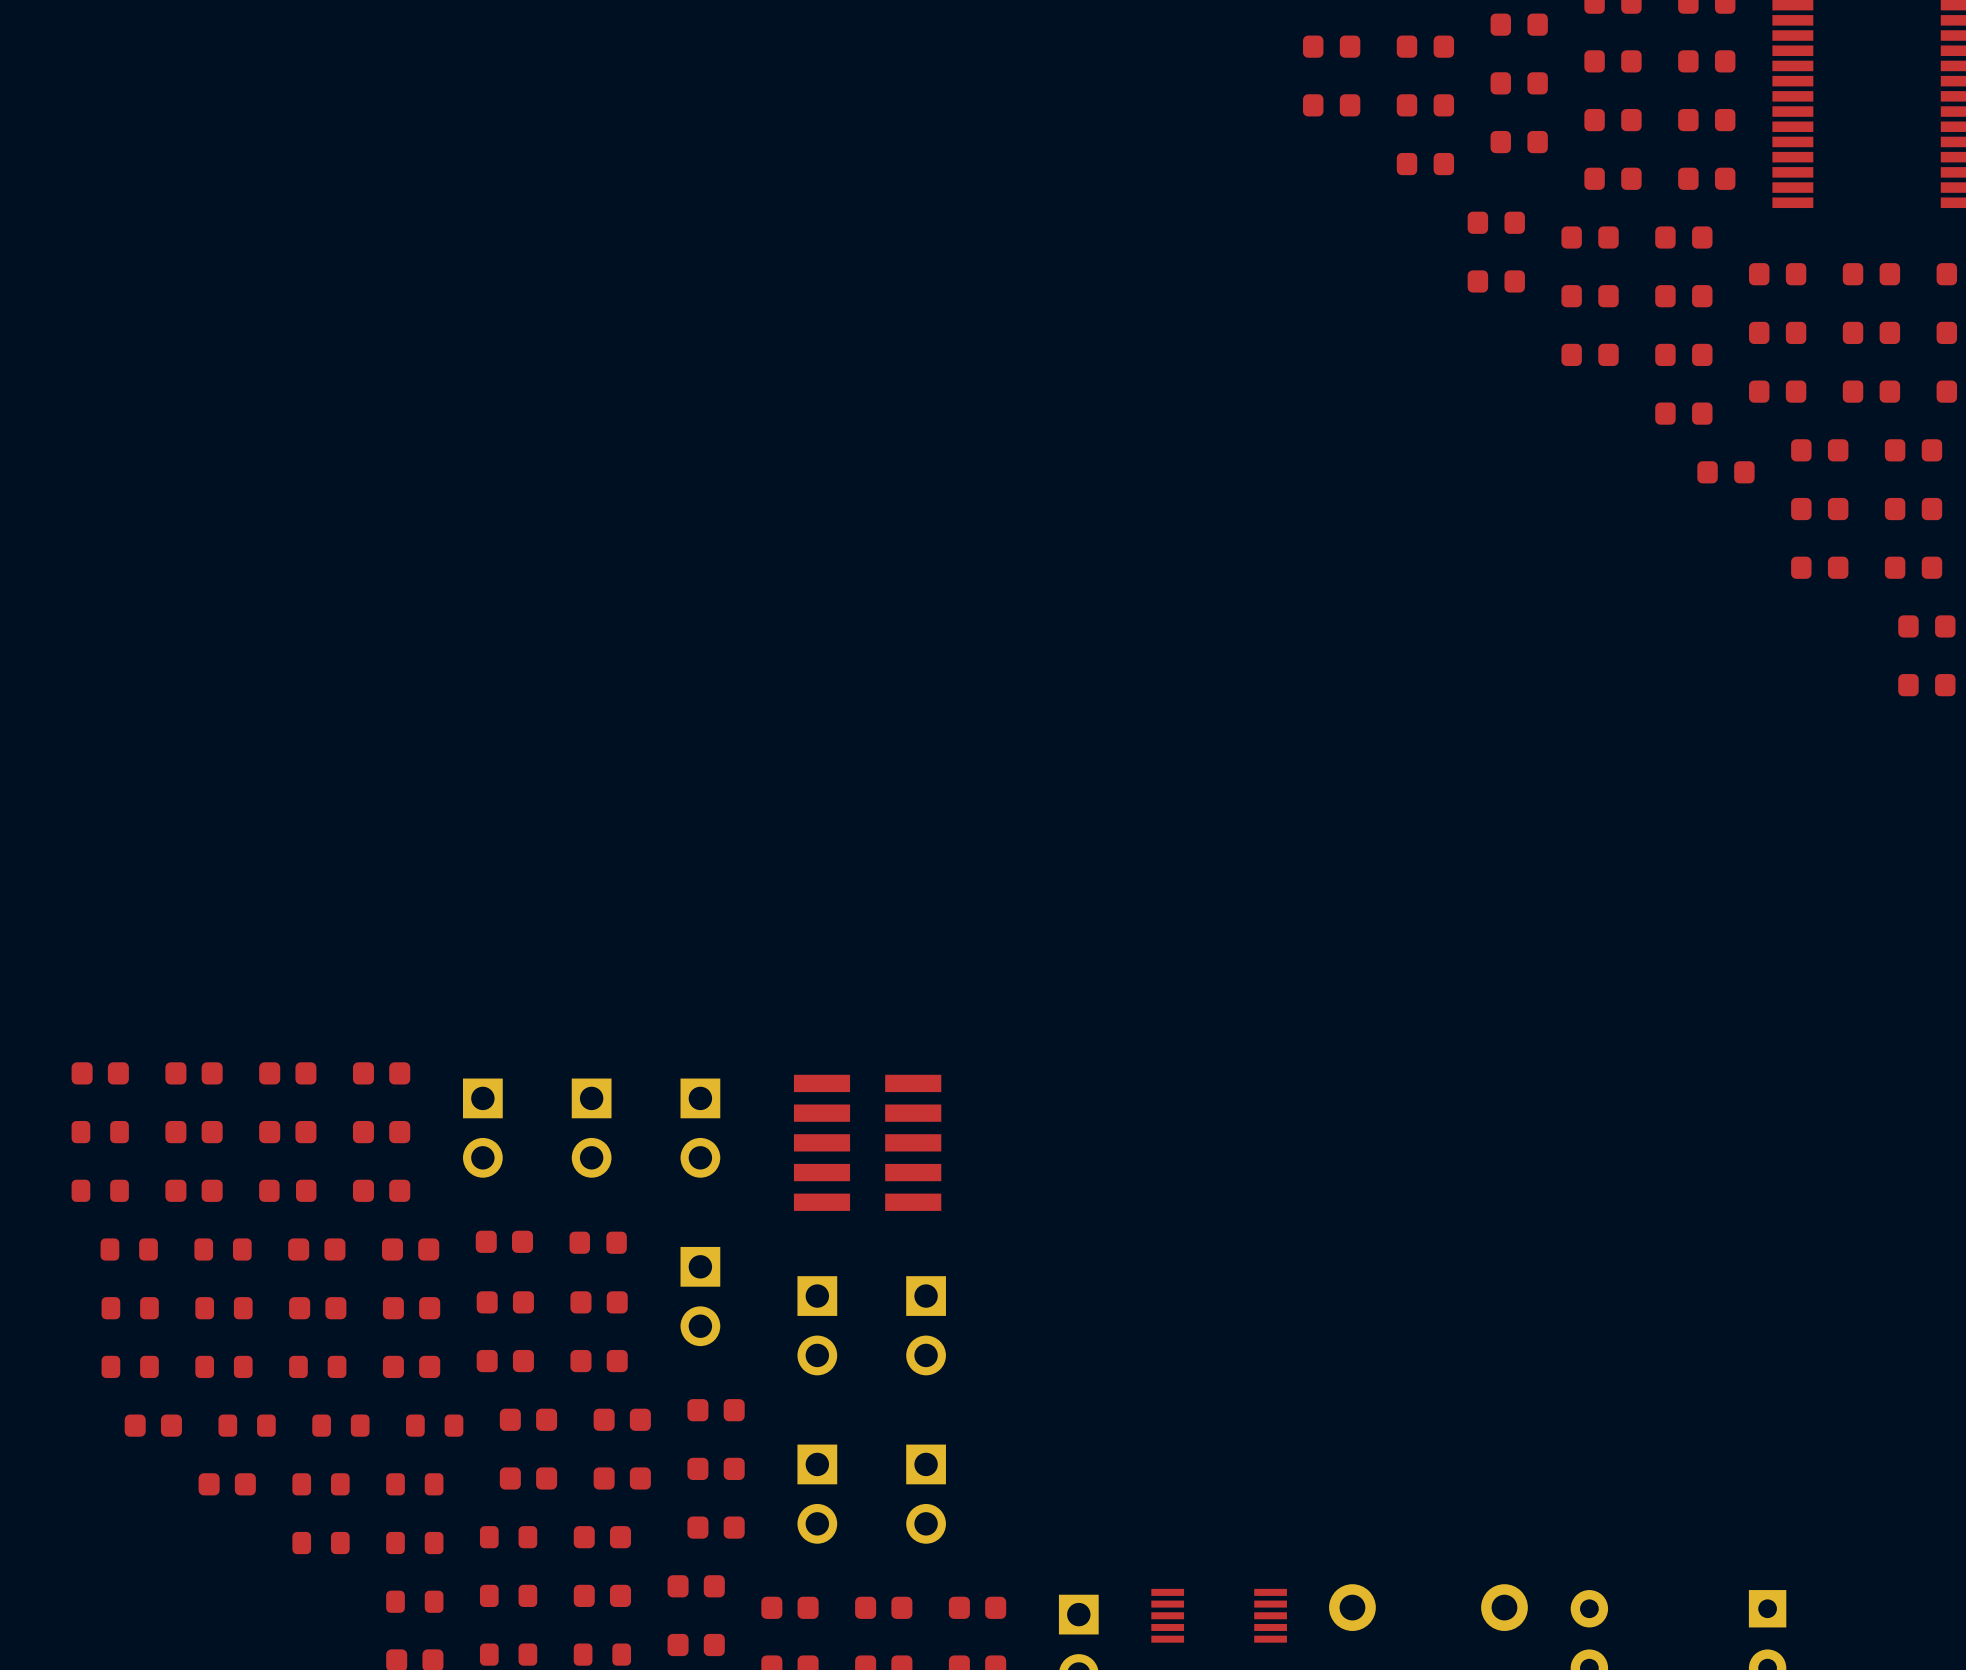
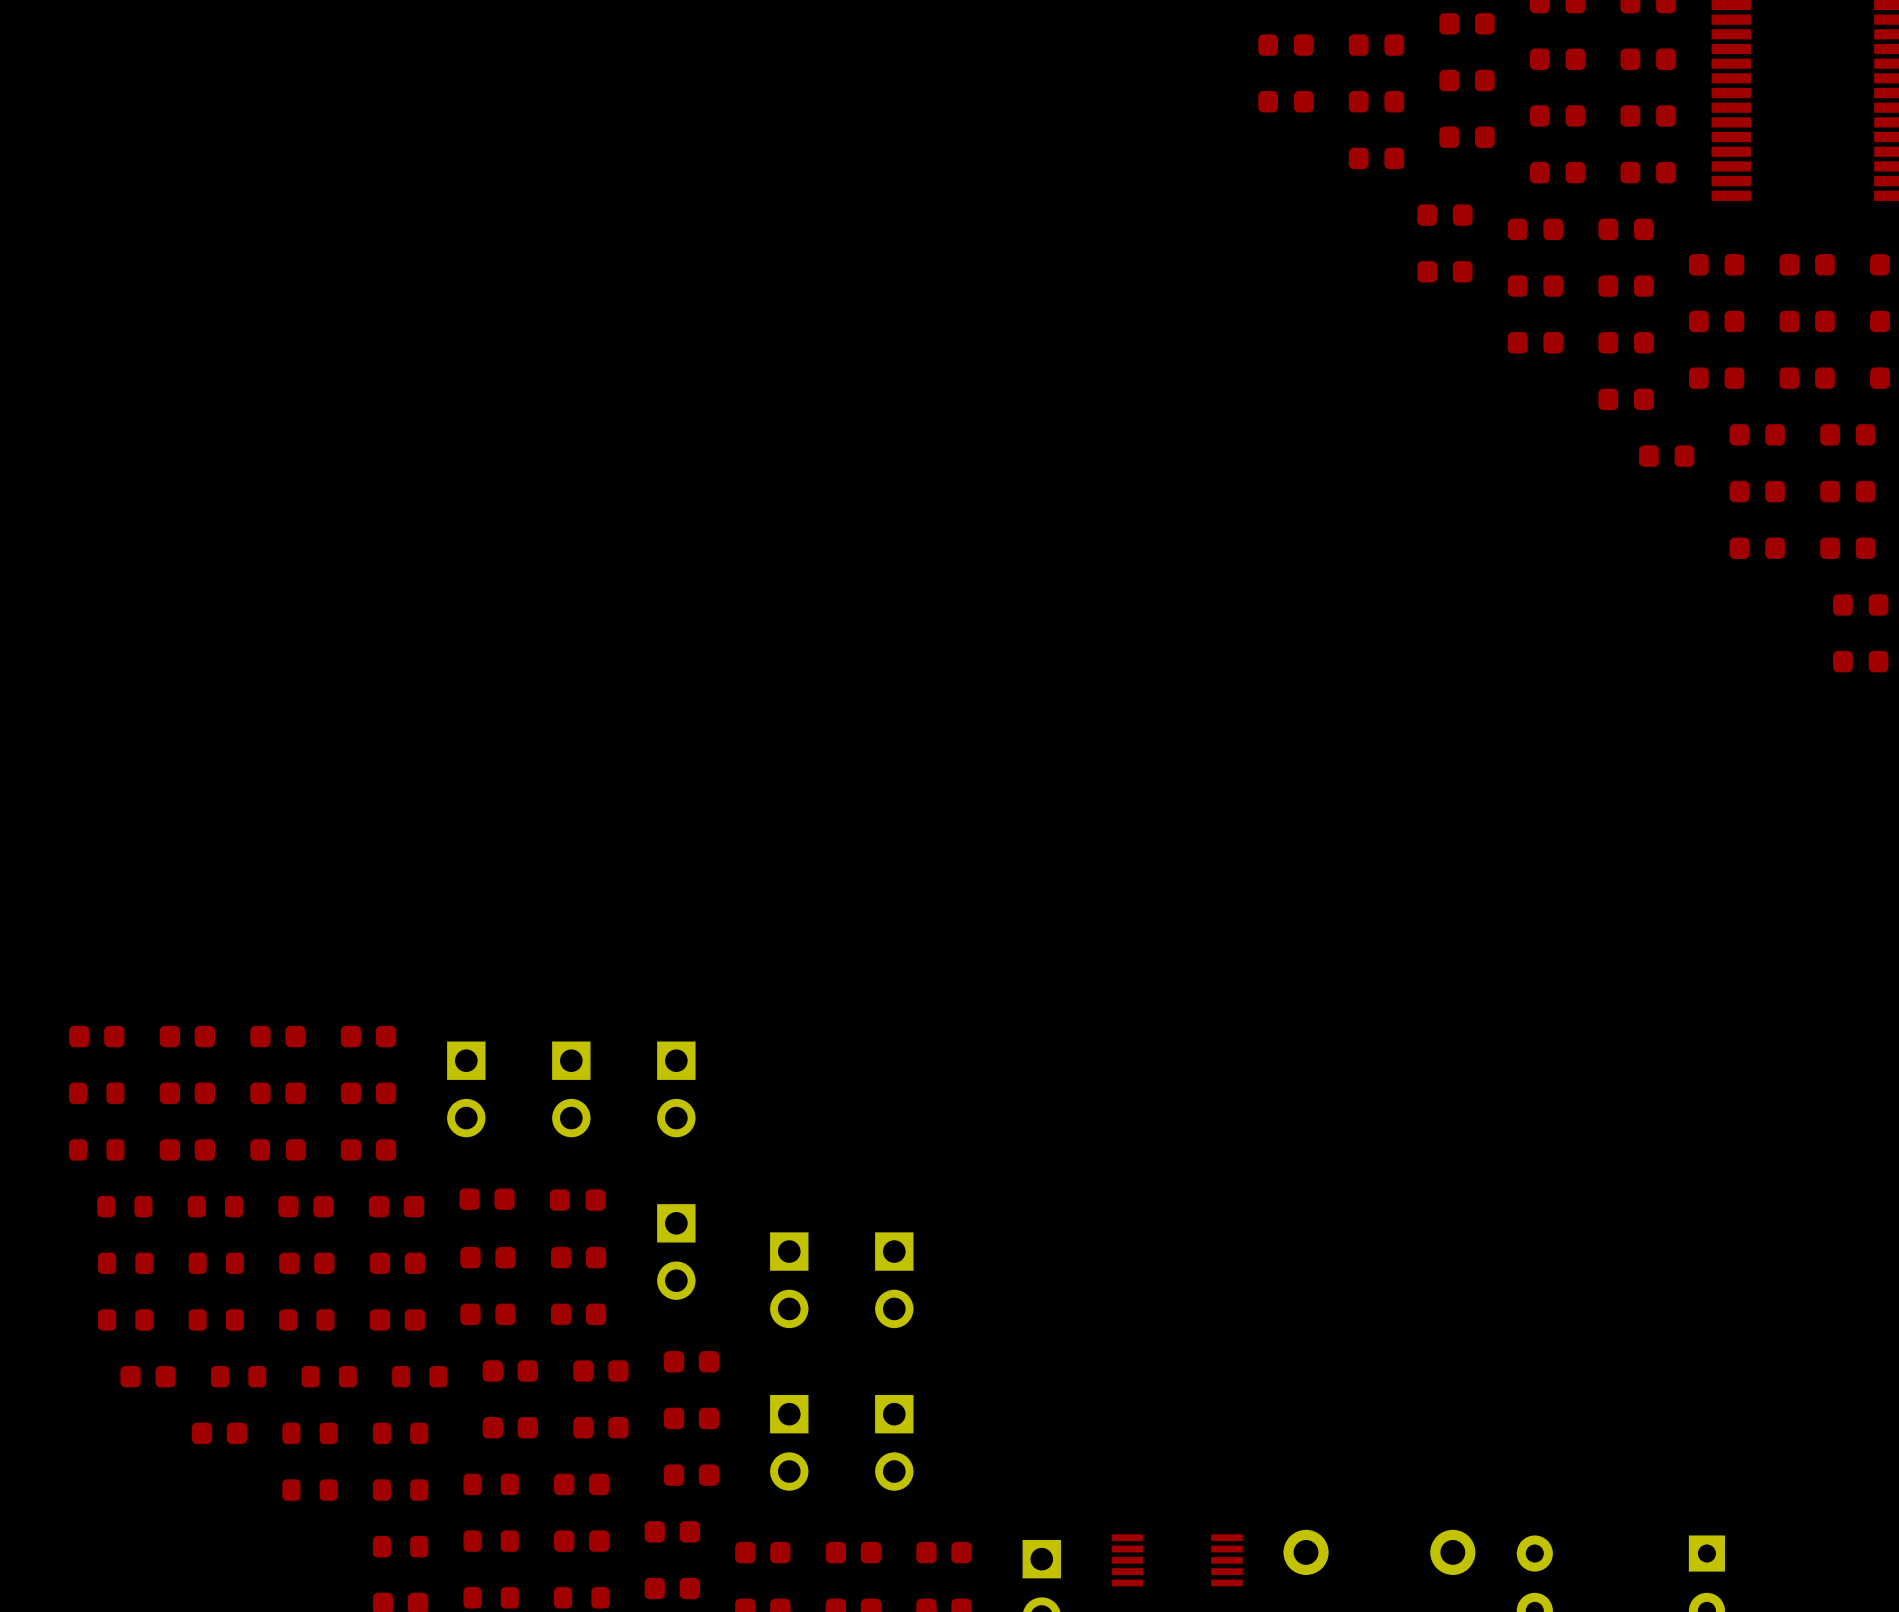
part: (867, 1142) -> none

